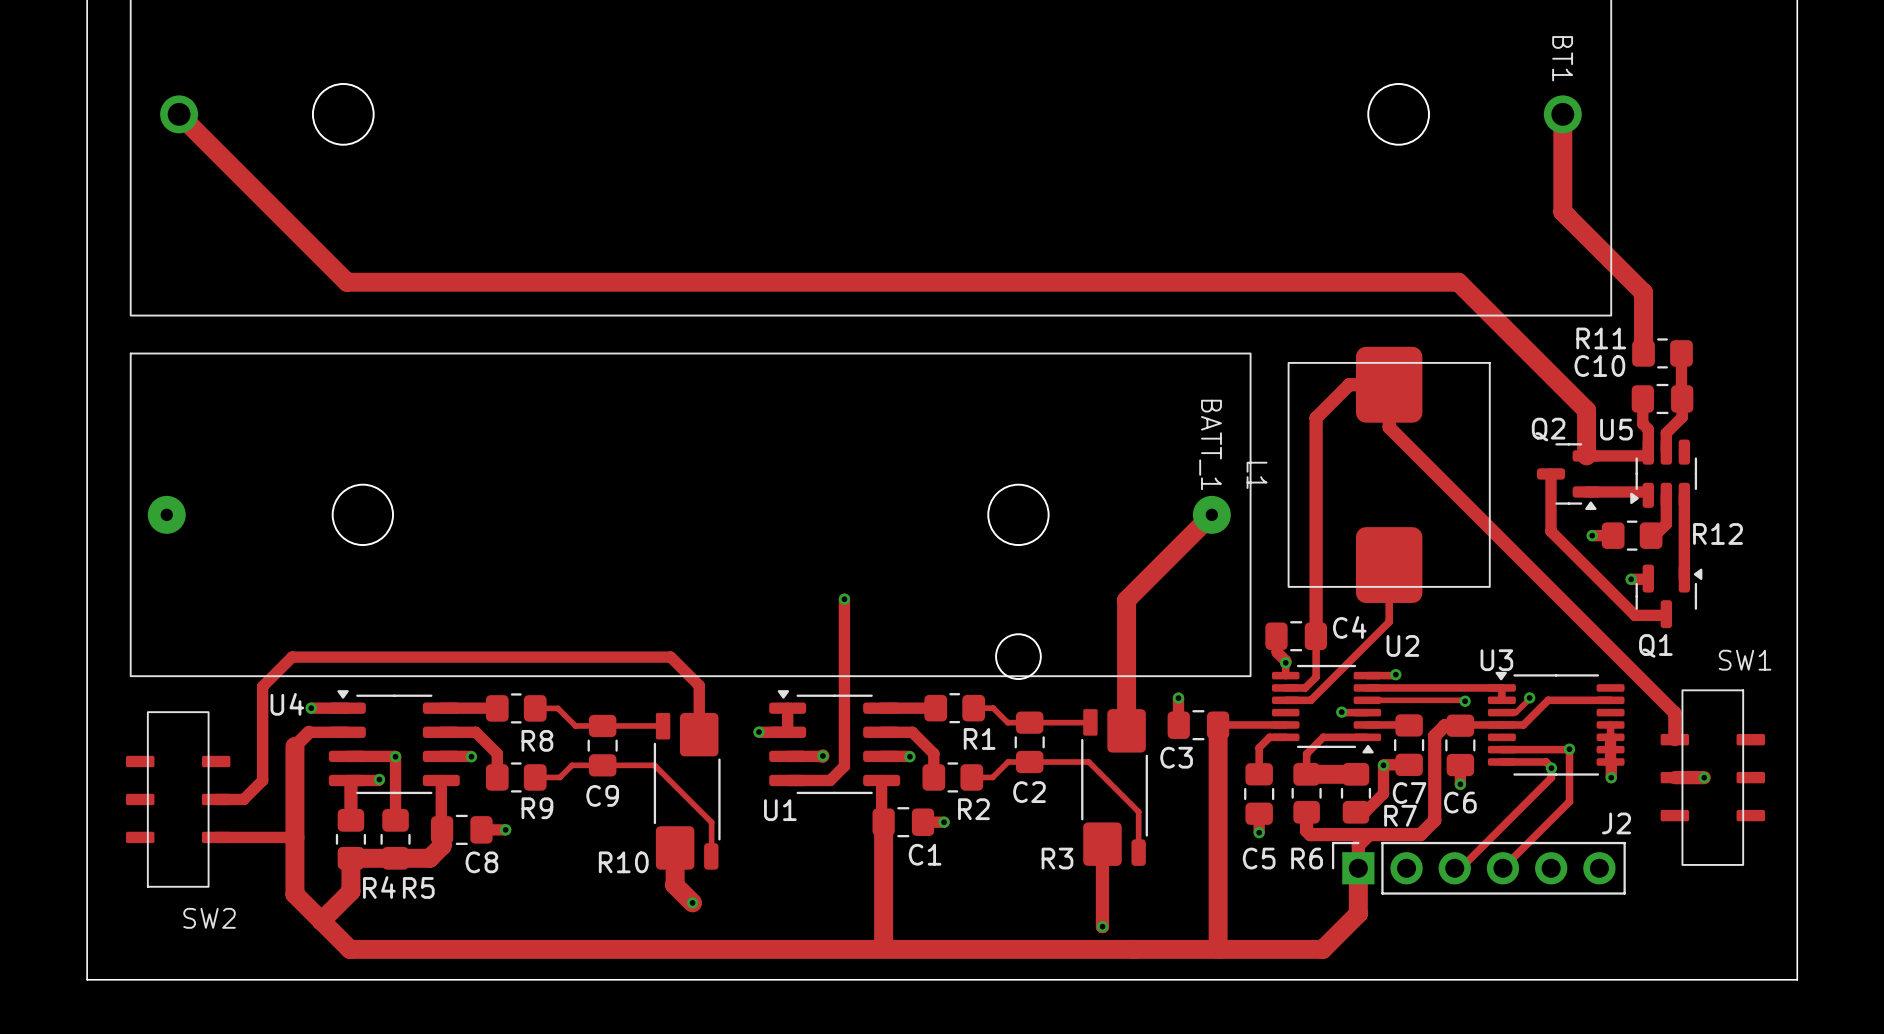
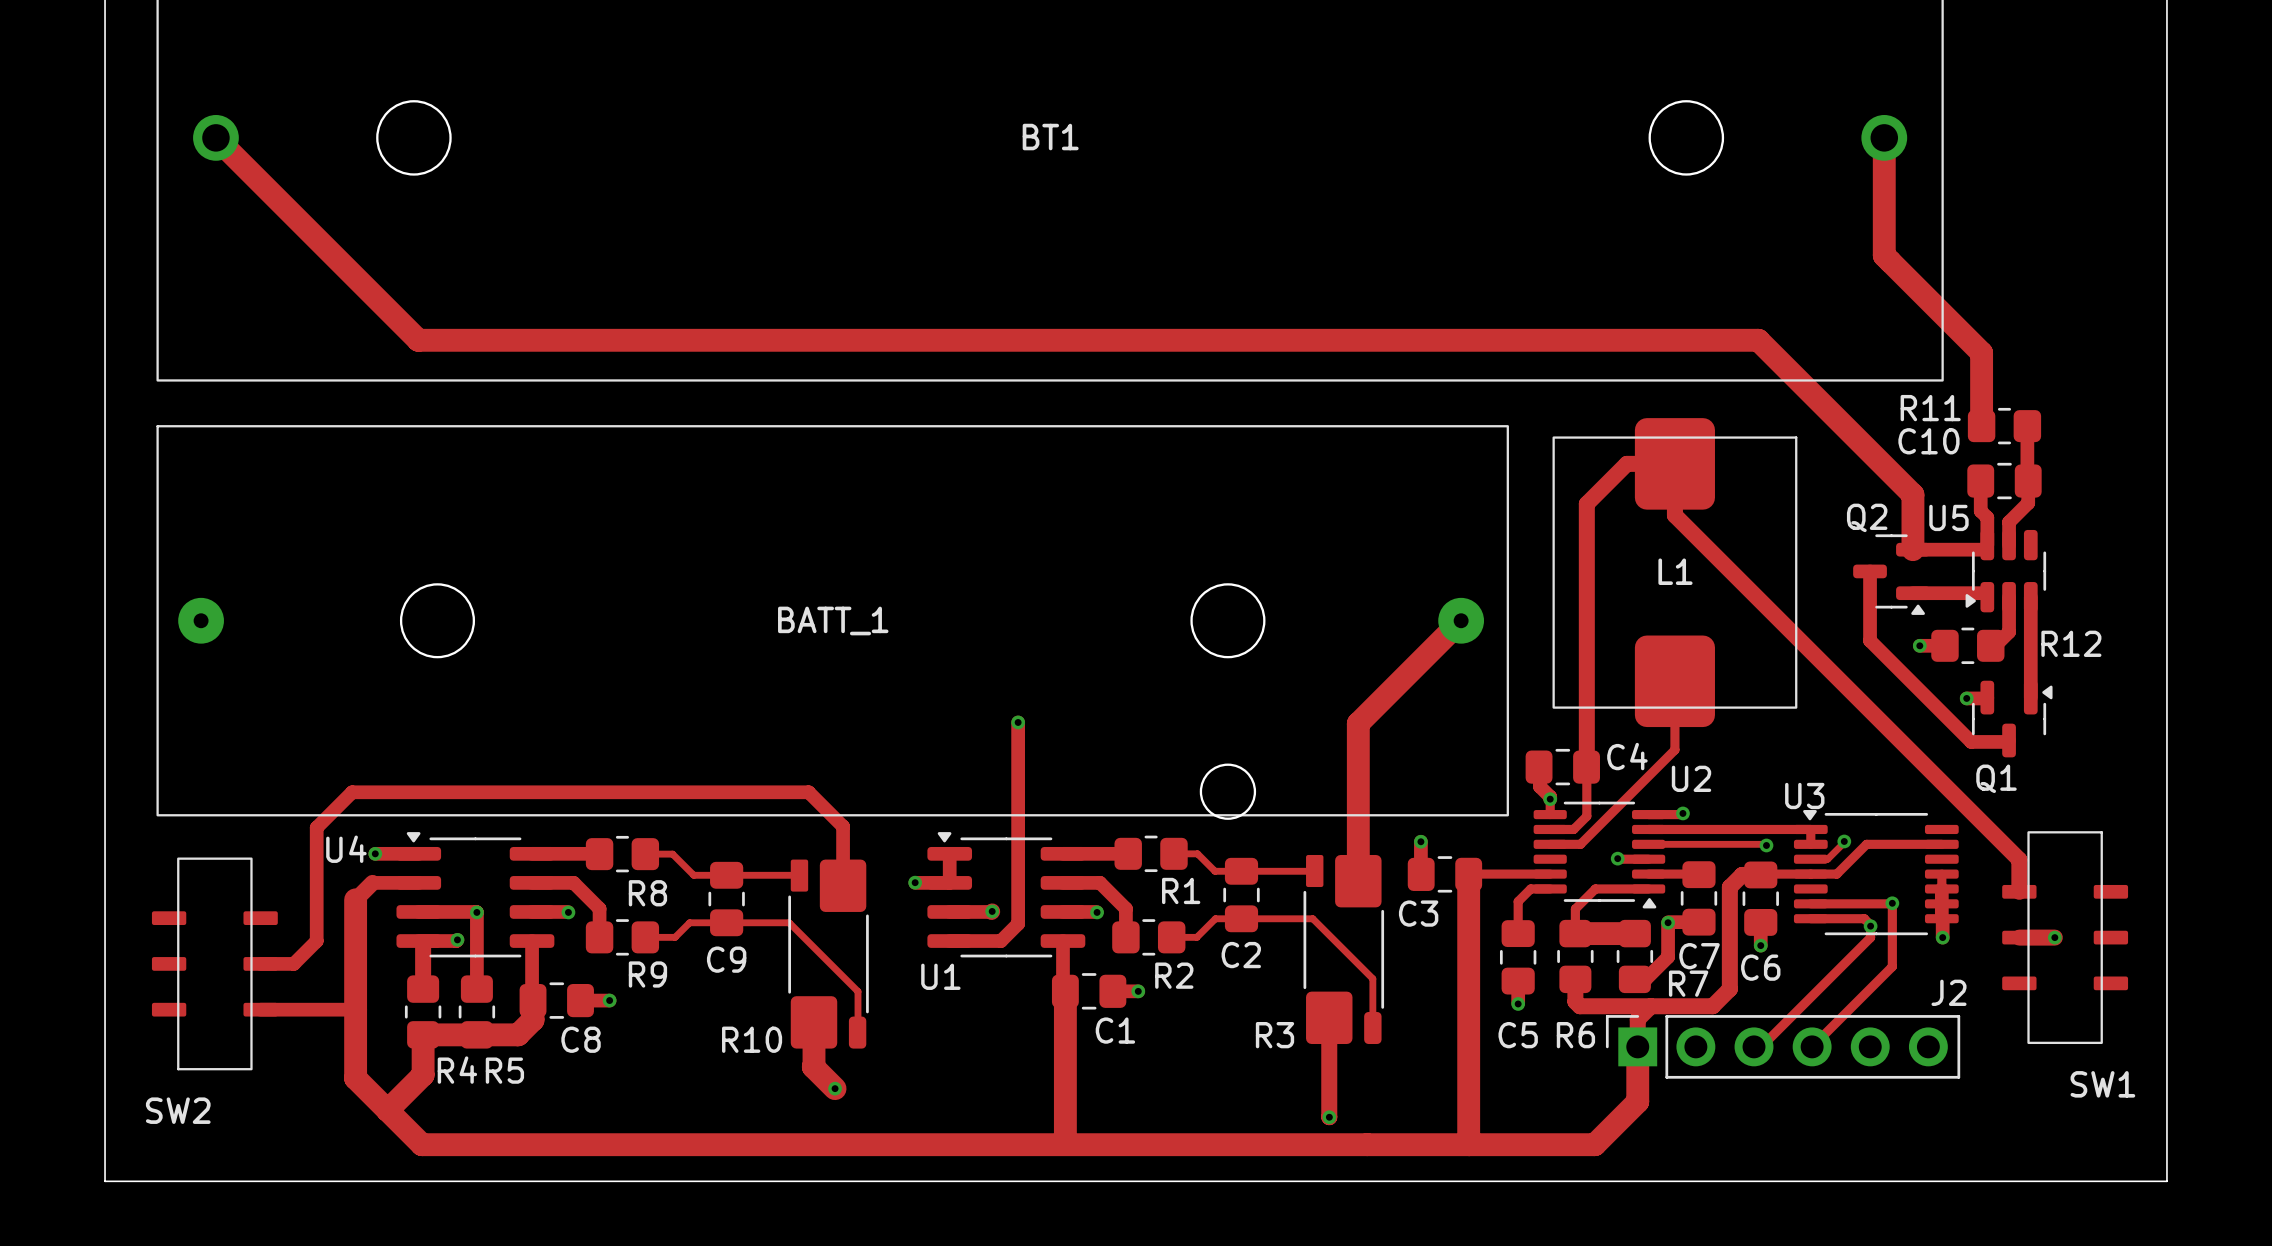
BT1 name rotation: 0° (1562, 58) -> 90° counterclockwise (1050, 137)
BT1 name position: BT1 (1562, 58) -> BT1 (1050, 137)
BATT_1 name rotation: 0° (1210, 444) -> 90° counterclockwise (833, 620)
BATT_1 name position: BATT_1 (1210, 444) -> BATT_1 (833, 620)
L1 name rotation: 0° (1257, 475) -> 90° counterclockwise (1675, 571)
L1 name position: L1 (1257, 475) -> L1 (1675, 571)
SW1 name position: SW1 (1745, 660) -> SW1 (2102, 1084)
SW2 name position: SW2 (209, 918) -> SW2 (178, 1110)

